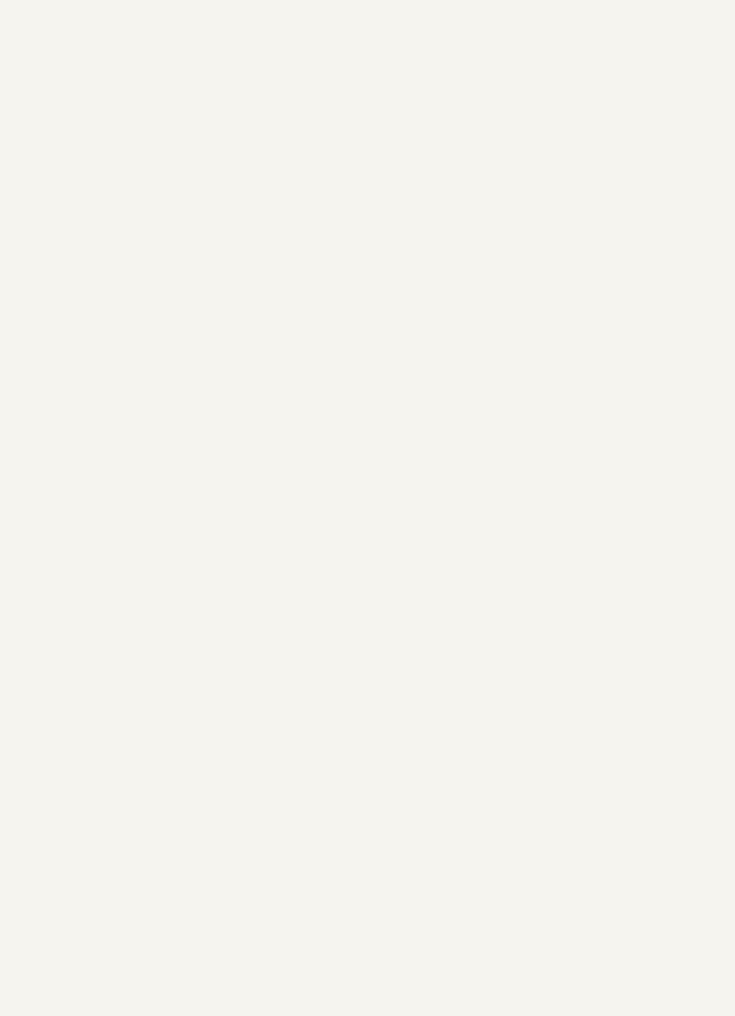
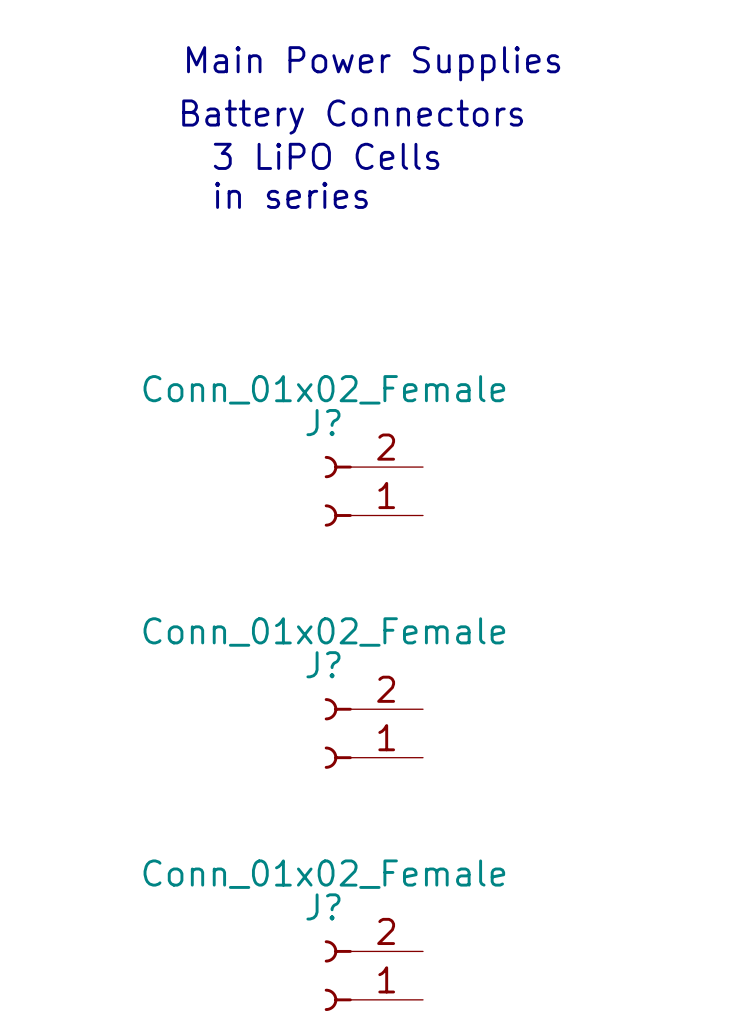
text: none -> Main Power Supplies (373, 63)
text: none -> Battery Connectors (352, 117)
text: none -> 3 LiPO Cells (326, 156)
text: none -> in series (291, 195)
J?: none -> Conn_01x02_Female (373, 491)
J?: none -> Conn_01x02_Female (373, 733)
J?: none -> Conn_01x02_Female (373, 975)

